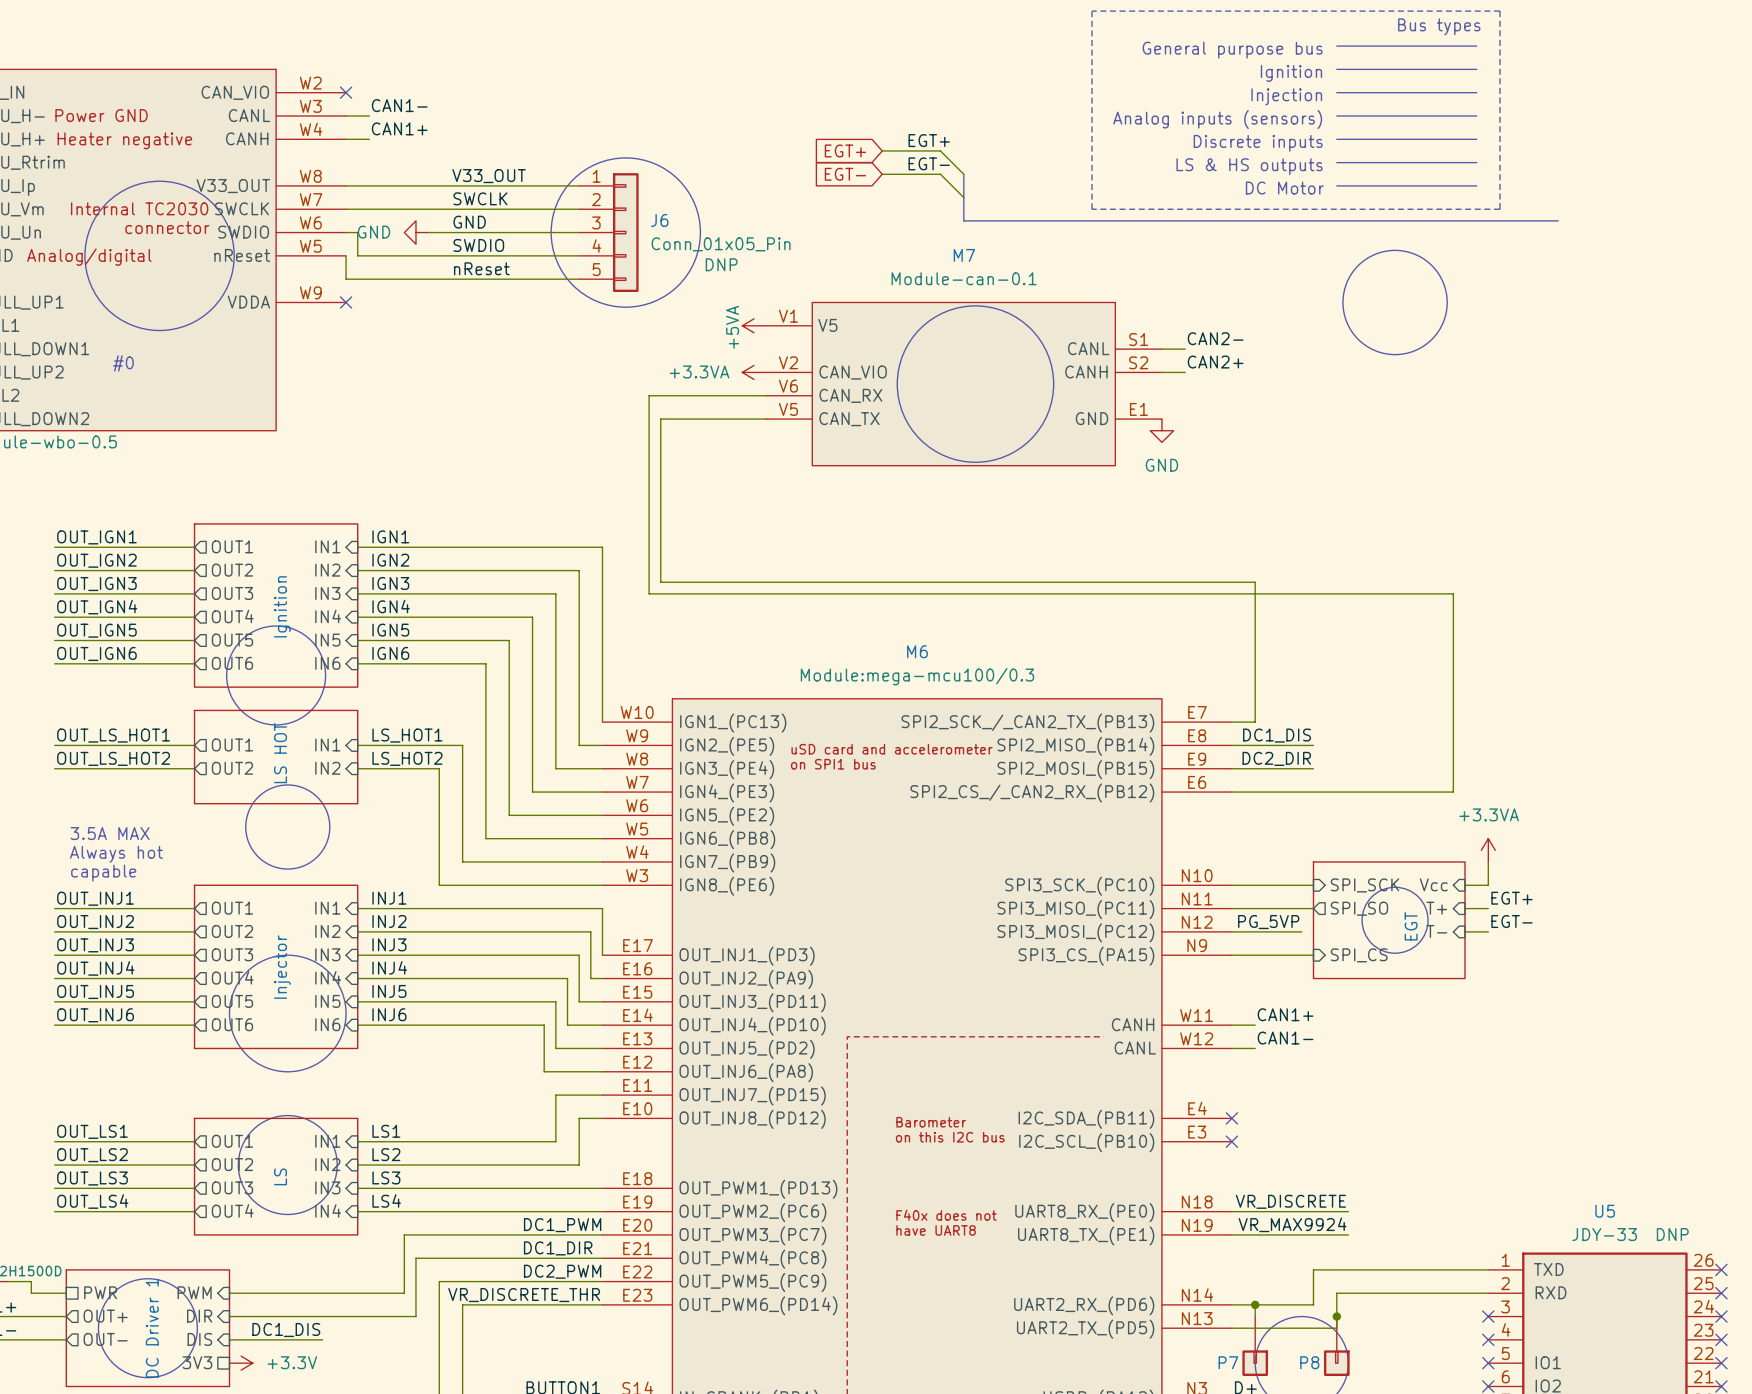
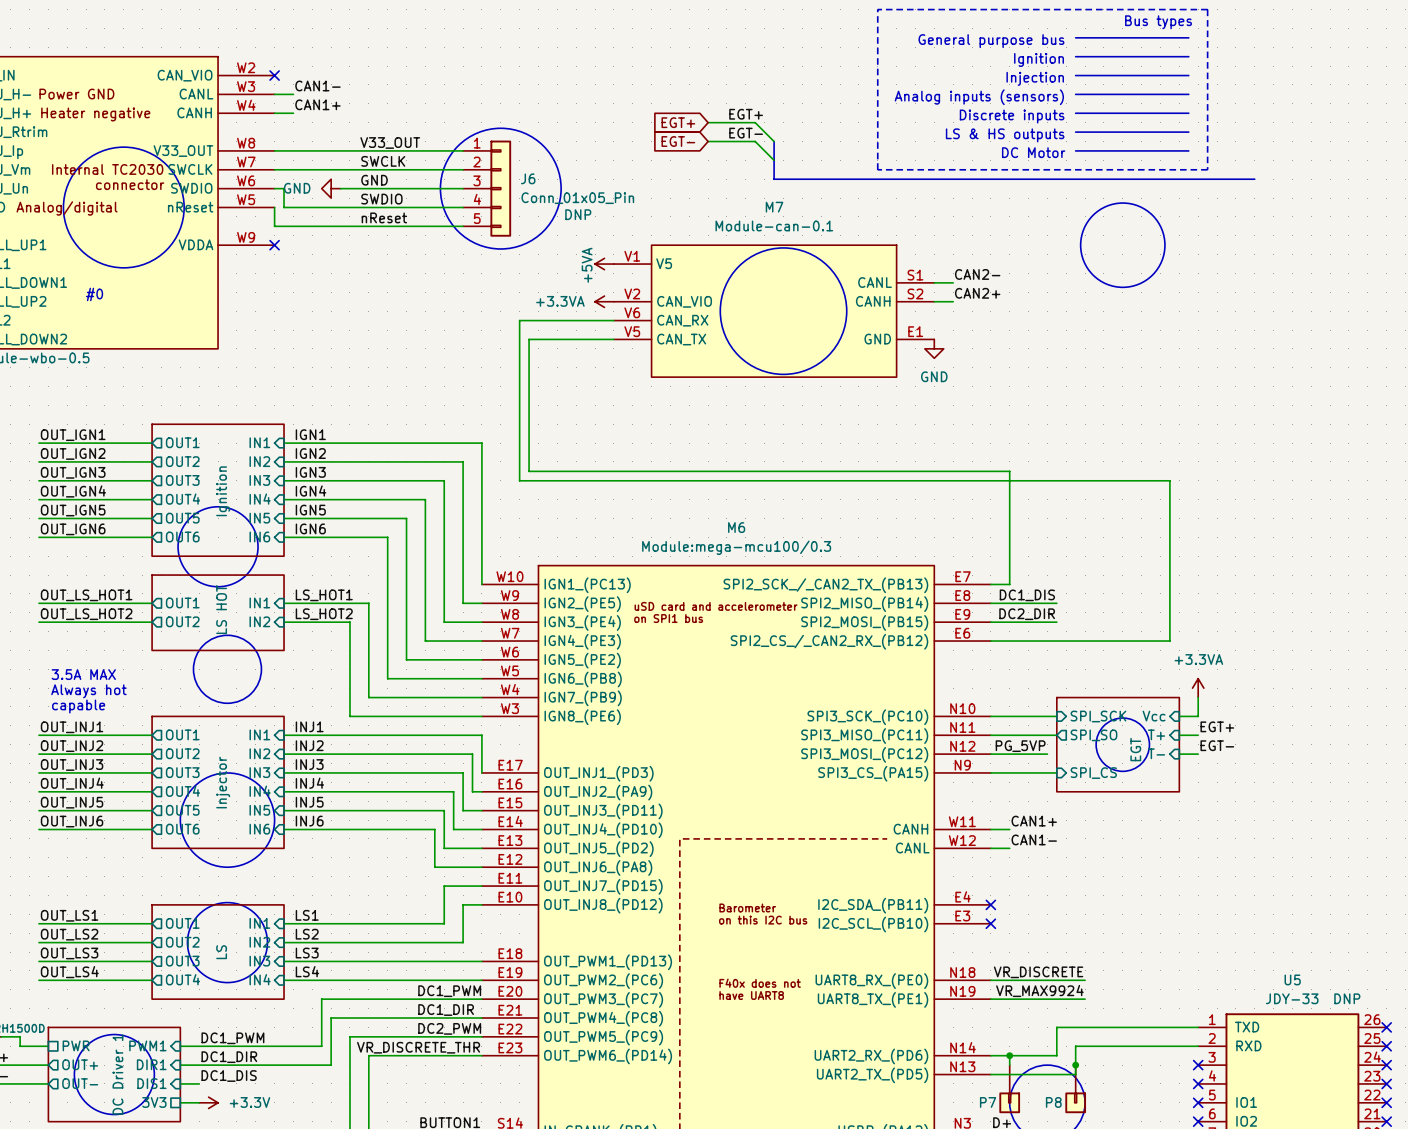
label: none -> DC1_PWM (232, 1038)
sheet pin: PWM (194, 1292) -> PWM1 (147, 1045)
label: none -> DC1_DIR (229, 1057)
sheet pin: DIR (199, 1316) -> DIR1 (151, 1064)
label position: DC1_DIS (286, 1330) -> DC1_DIS (229, 1076)
sheet pin: DIS (199, 1339) -> DIS1 (151, 1083)
wire: (252, 1339) (322, 1339) -> none
power symbol position: +3.3V (241, 1363) -> +3.3V (208, 1102)

